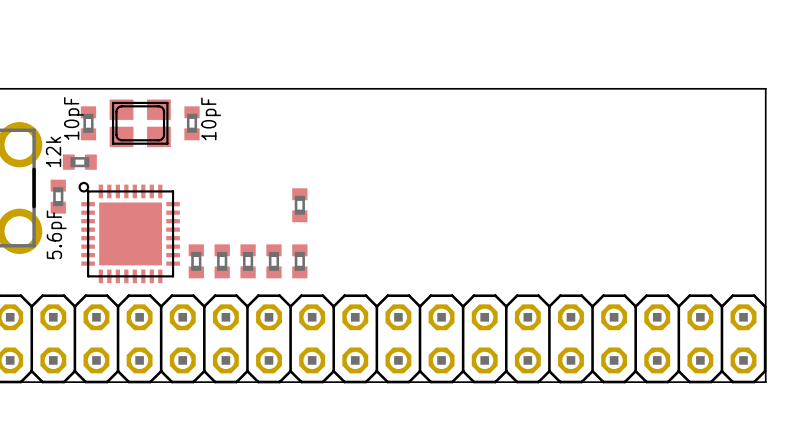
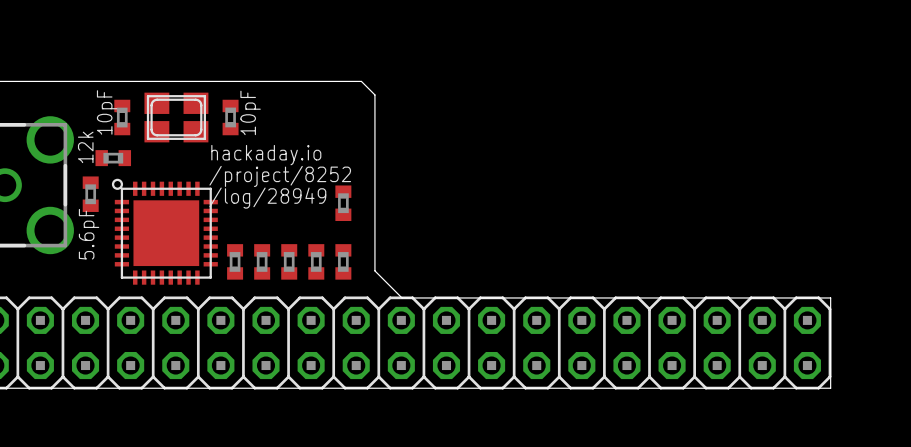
board edge: (317, 88) (765, 88) (765, 295) -> (361, 81) (374, 94) (374, 270) (402, 297) (830, 297)
text: none -> hackaday.io (266, 155)
text: none -> /project/8252 (280, 176)
text: none -> /log/28949 (267, 198)

